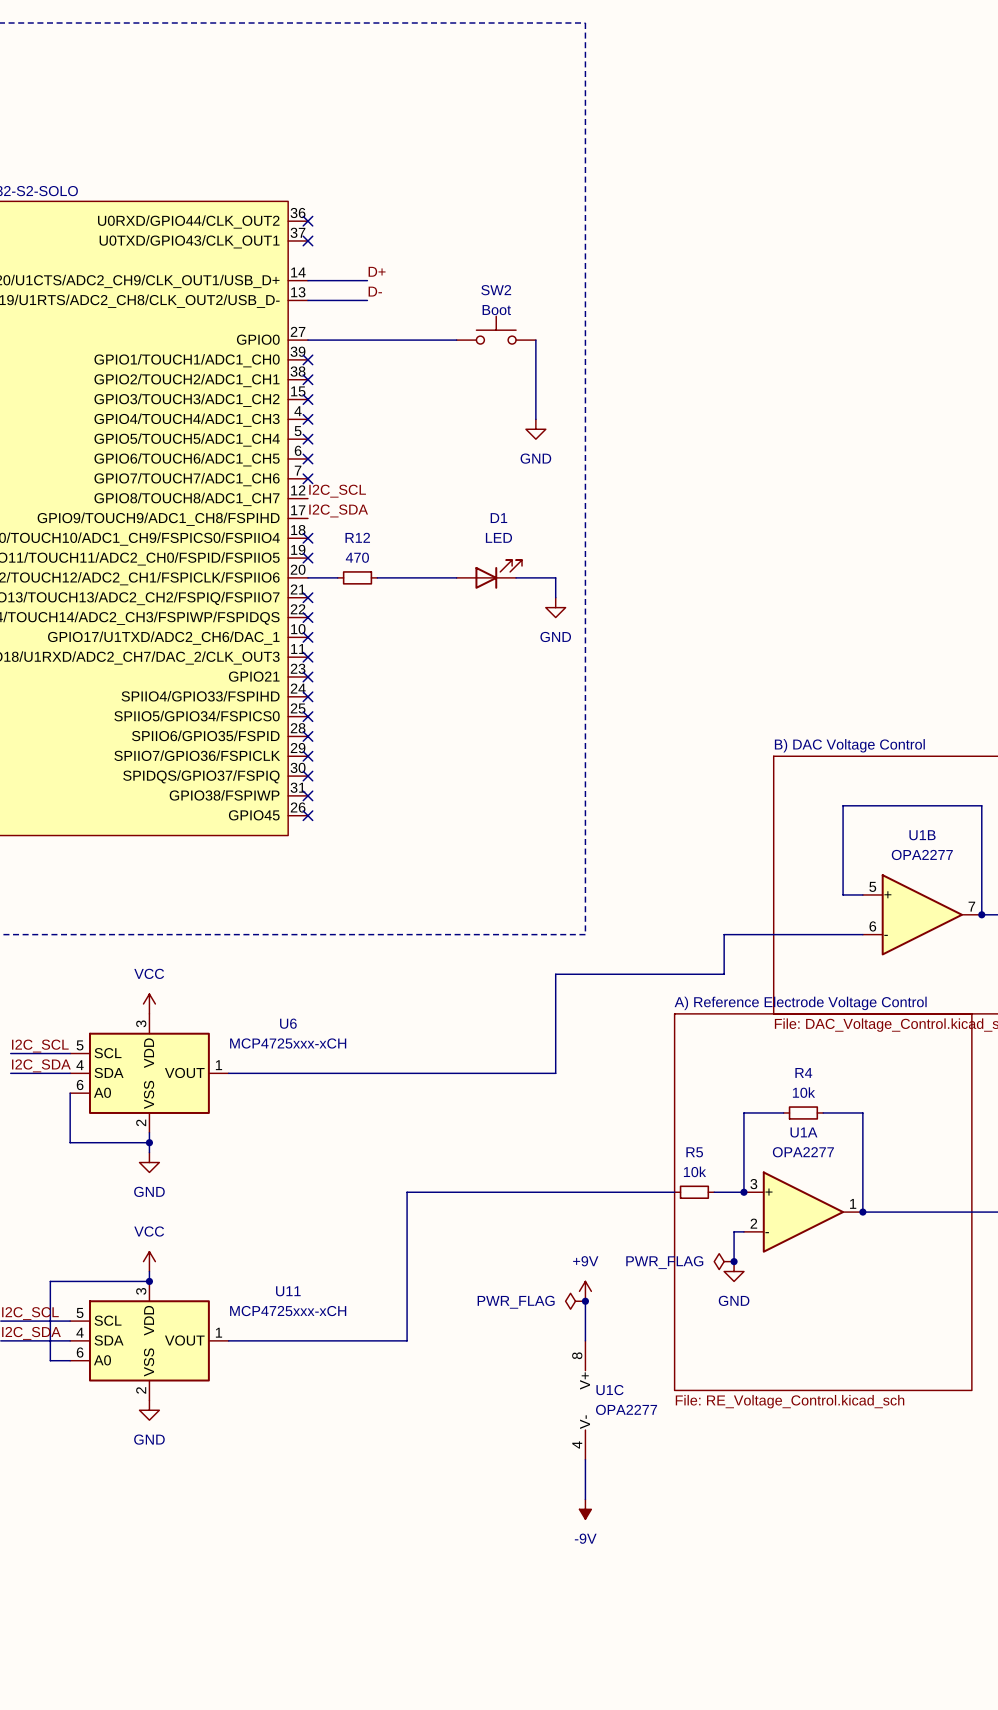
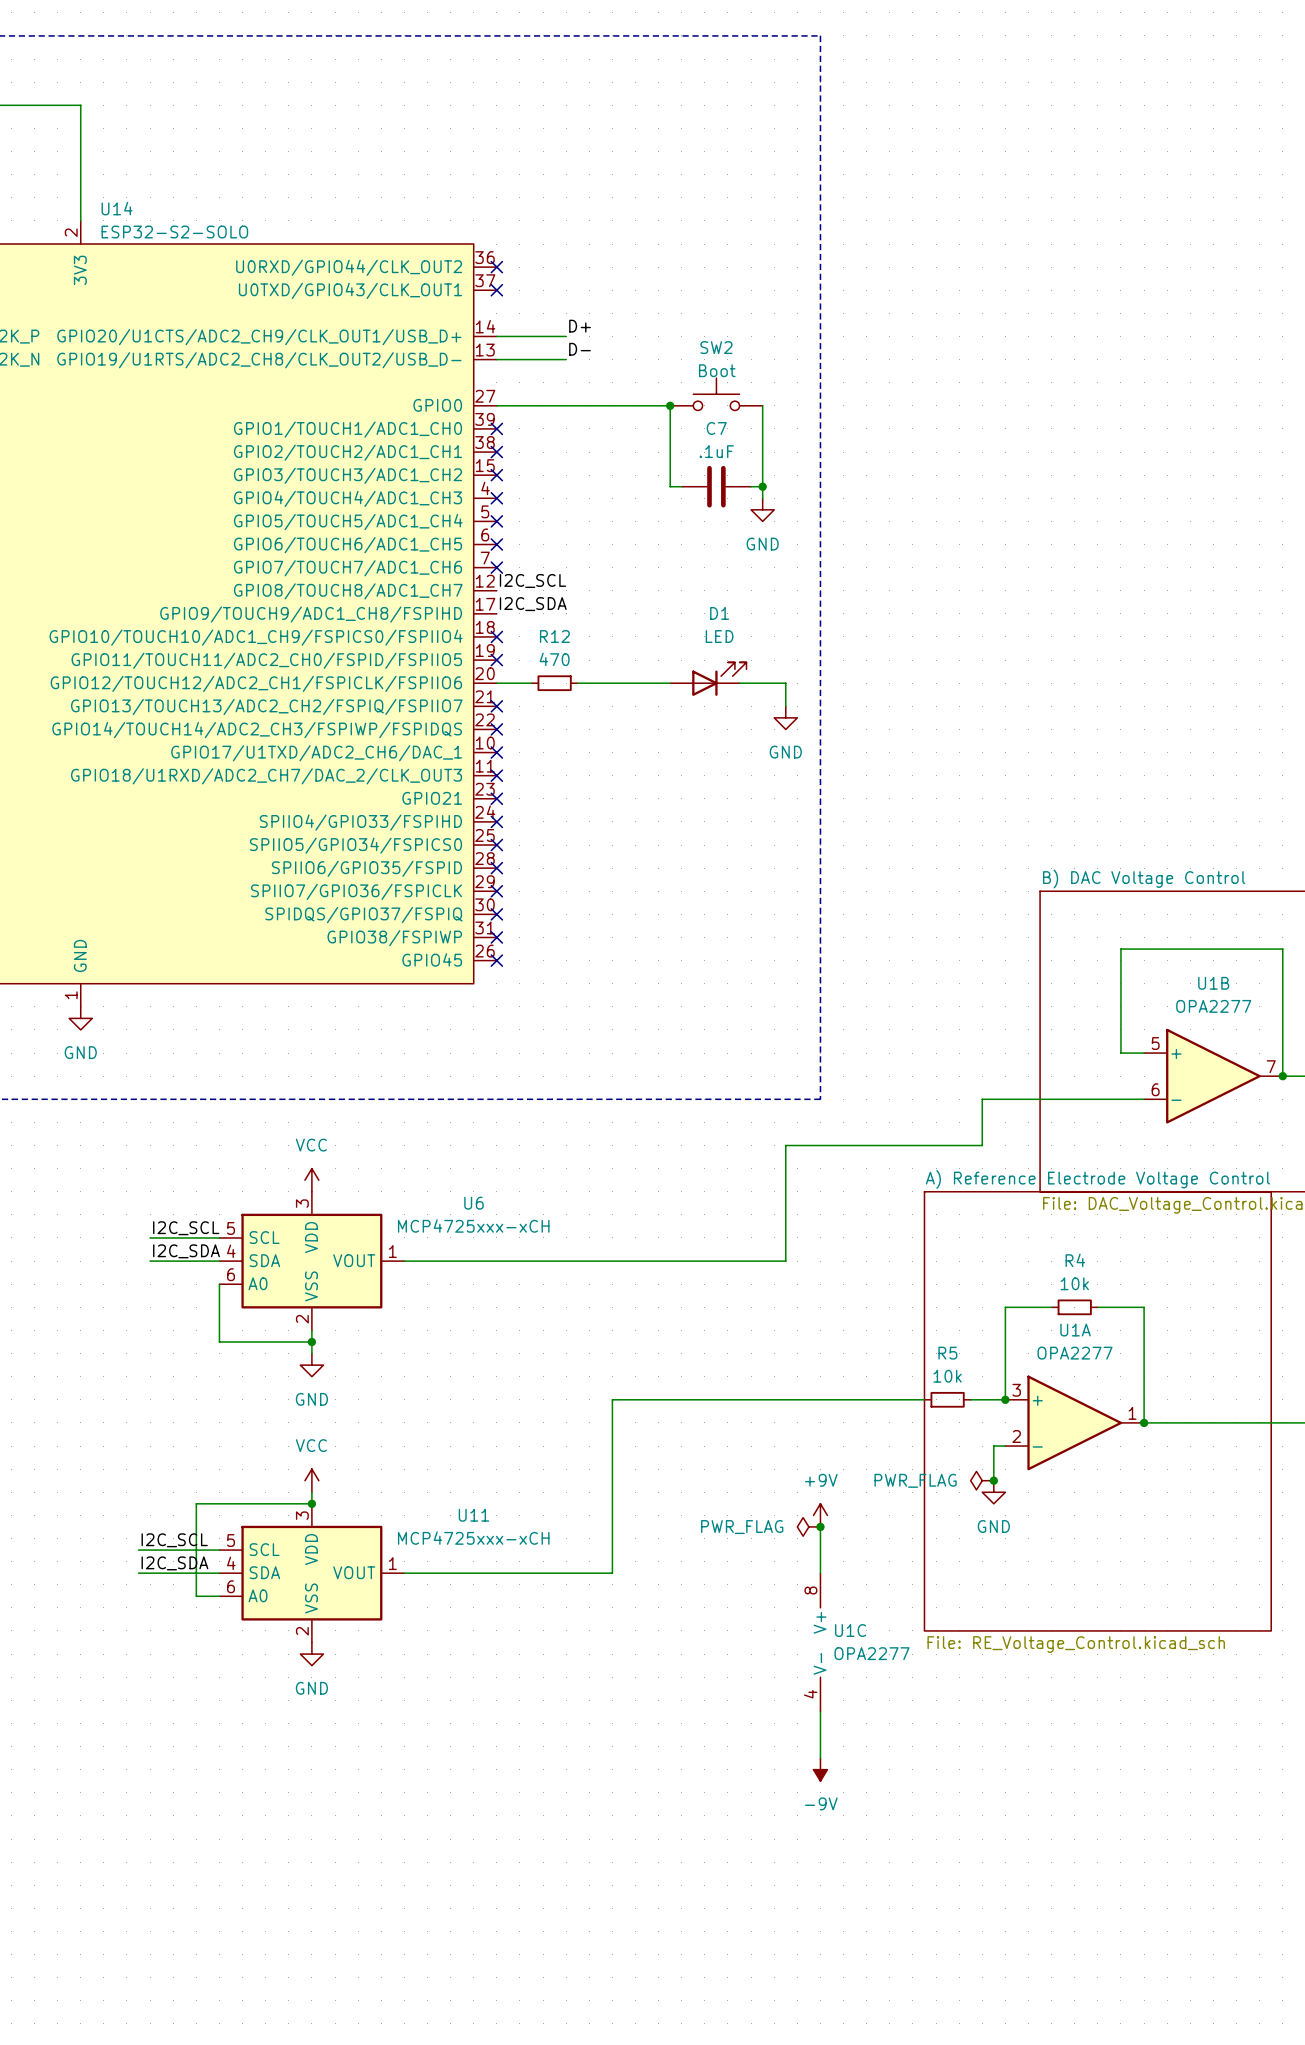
wire: none -> (670, 405) (670, 486) (681, 486)
junction: none -> (670, 405)
C7: none -> .1uF (716, 486)
wire: none -> (751, 486) (762, 486)
junction: none -> (762, 486)

